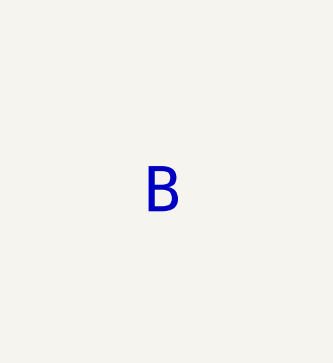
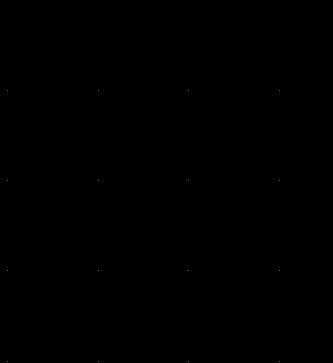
text: B (163, 188) -> none

